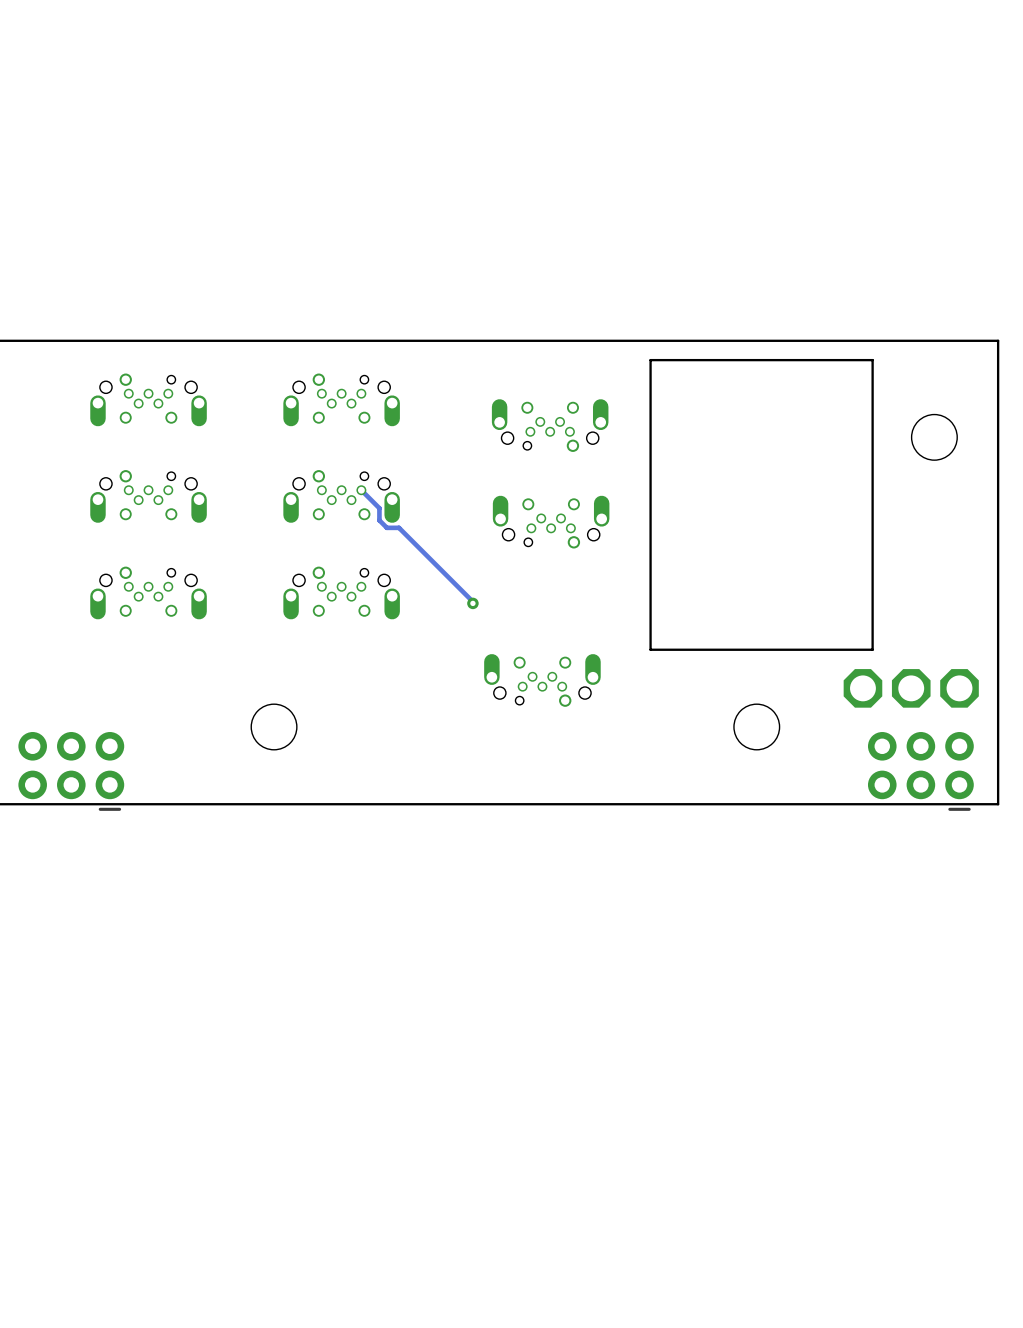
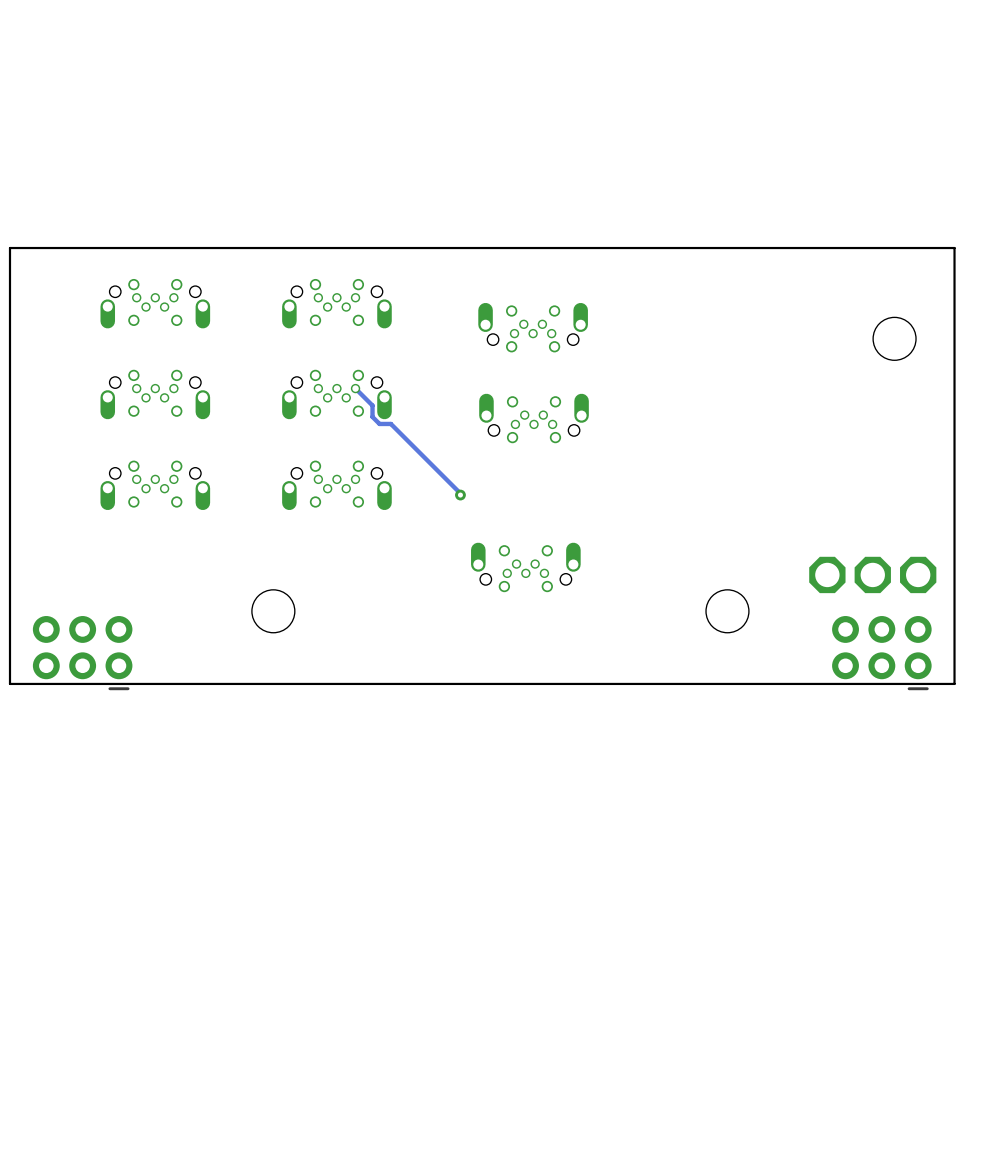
board edge: (872, 360) (872, 649) (650, 649) (650, 360) (872, 360) -> none
part footprint: [90, 373, 207, 427] -> [100, 278, 211, 329]
part footprint: [283, 373, 400, 427] -> [282, 278, 392, 329]
part footprint: [491, 399, 609, 452] -> [478, 302, 588, 353]
part footprint: [90, 470, 207, 523] -> [100, 369, 211, 420]
part footprint: [283, 470, 400, 523] -> [282, 369, 392, 420]
part footprint: [492, 495, 610, 549] -> [479, 393, 589, 444]
part footprint: [90, 566, 207, 620] -> [100, 460, 211, 511]
part footprint: [283, 566, 400, 620] -> [282, 460, 392, 511]
part footprint: [484, 654, 601, 707] -> [471, 542, 581, 593]

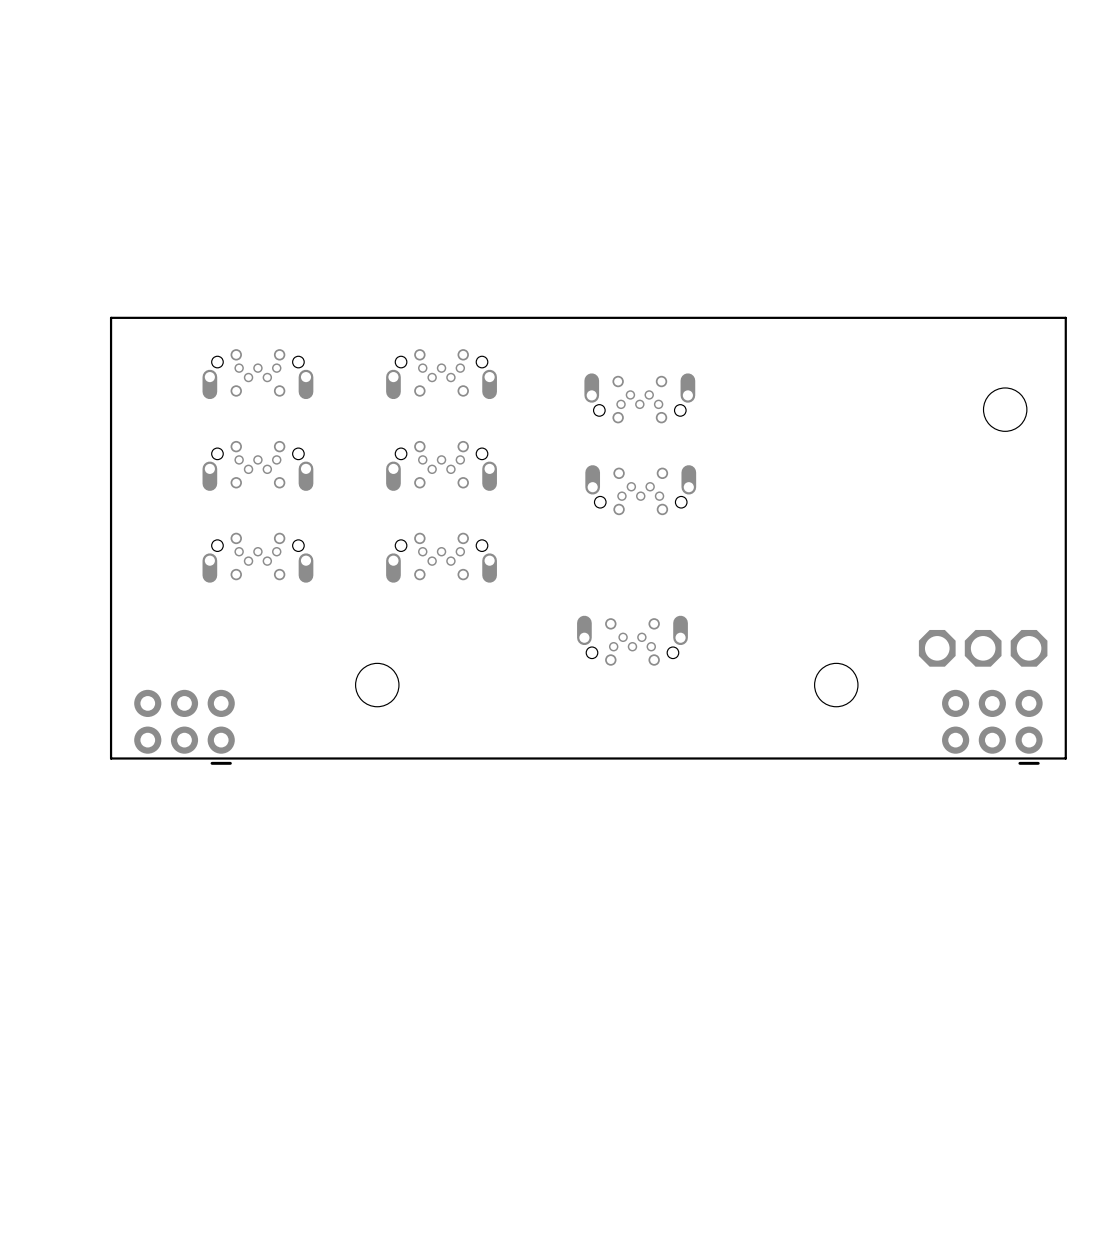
track: (355, 388) (372, 405) (372, 416) (379, 423) (390, 423) (460, 495) -> none
via: (460, 495) -> none

